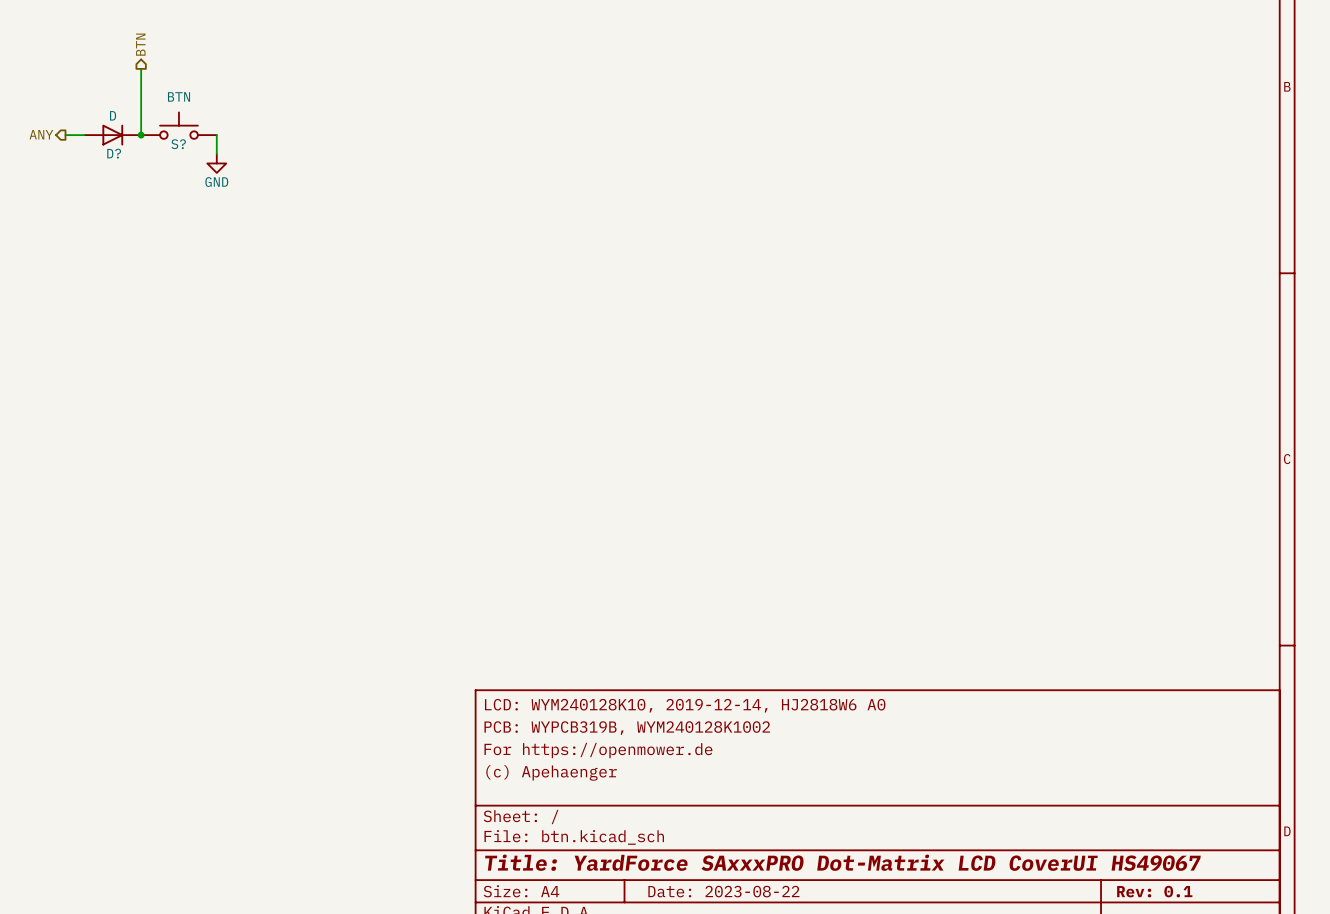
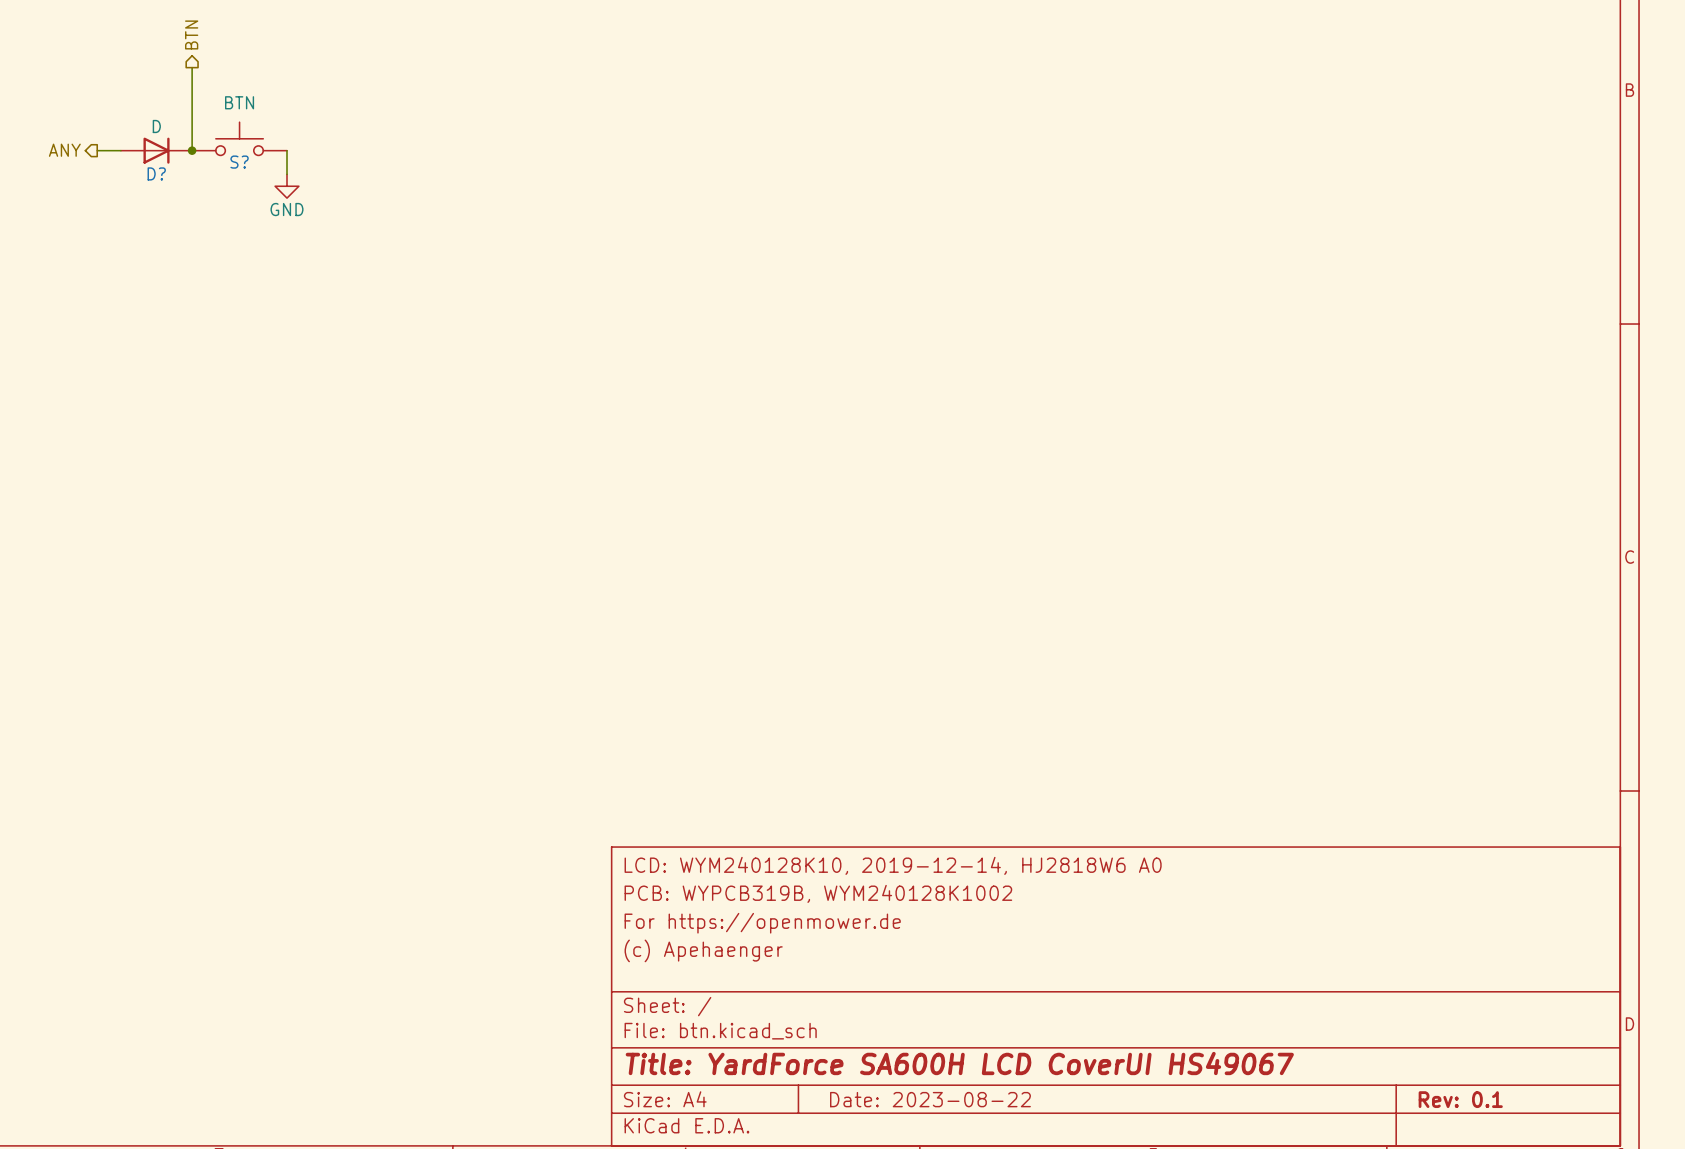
title block: Title: YardForce SAxxxPRO Dot-Matrix LCD CoverUI HS49067 (842, 862) -> Title: YardForce SA600H LCD CoverUI HS49067 (959, 1063)

